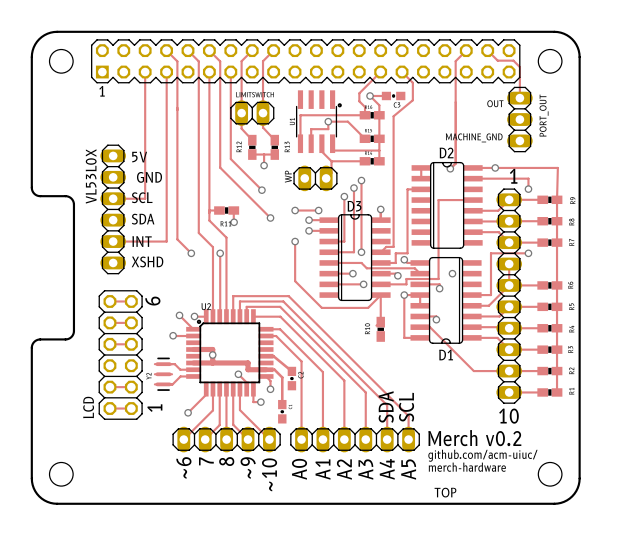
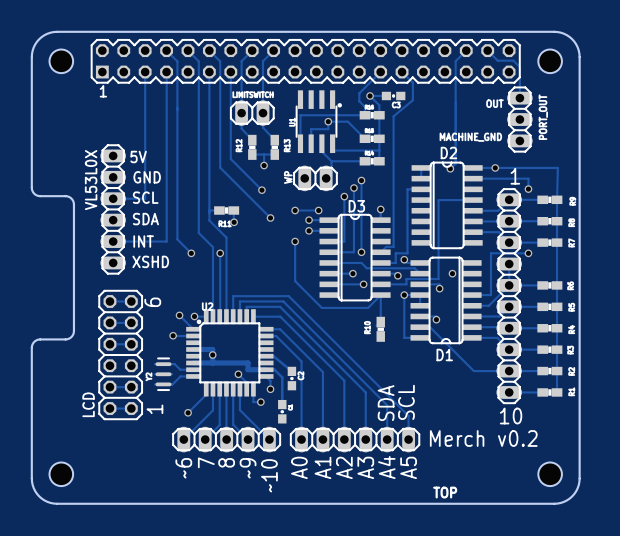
text: github.com/acm-uiuc/ (482, 455) -> none
text: merch-hardware (467, 467) -> none

